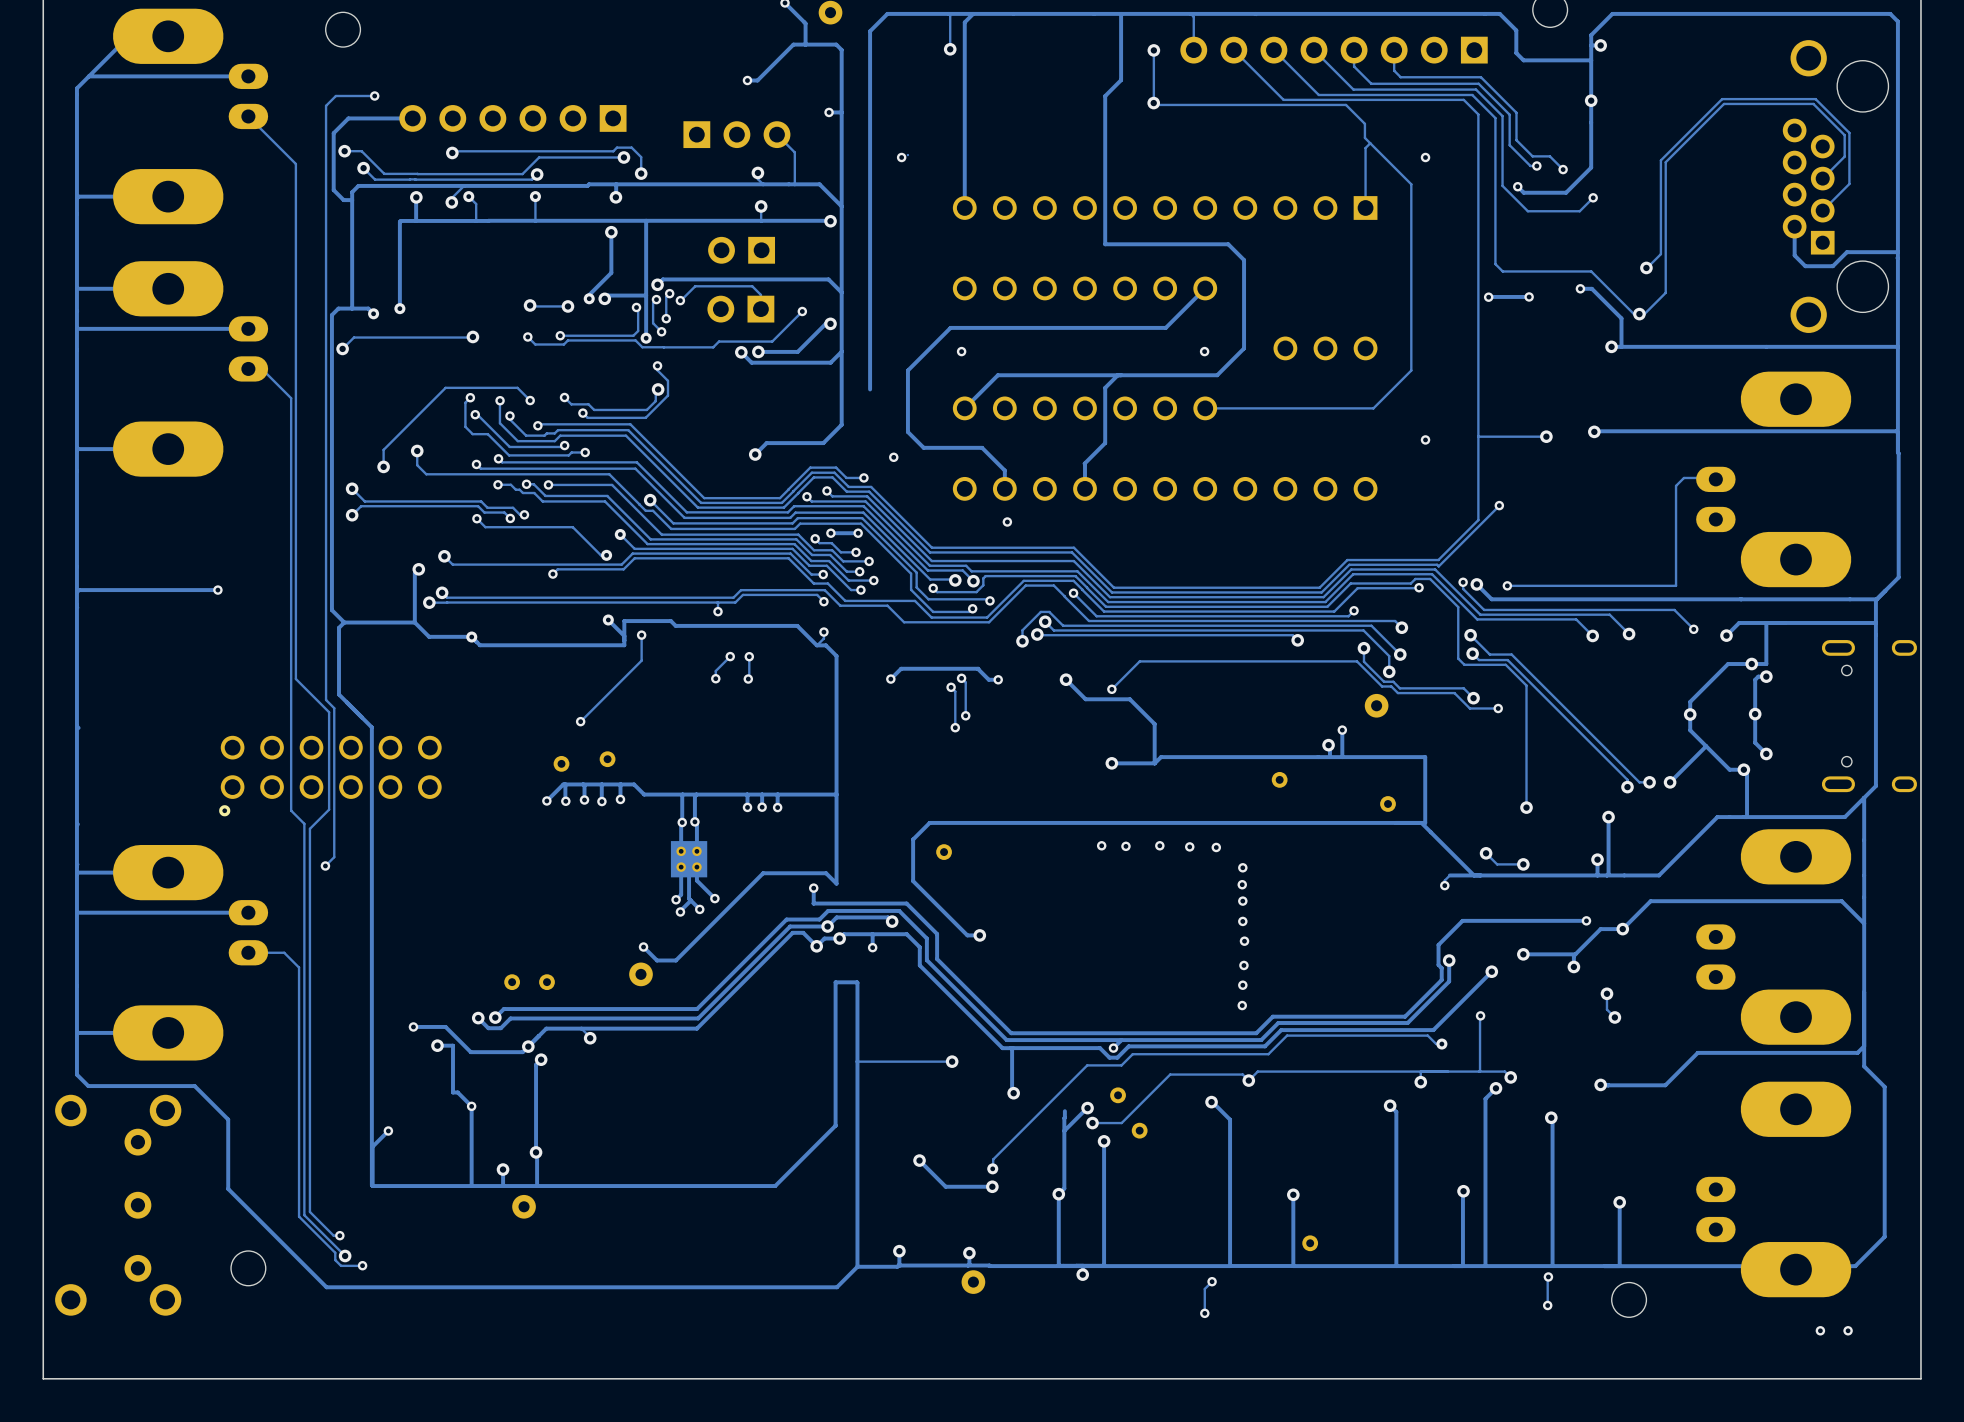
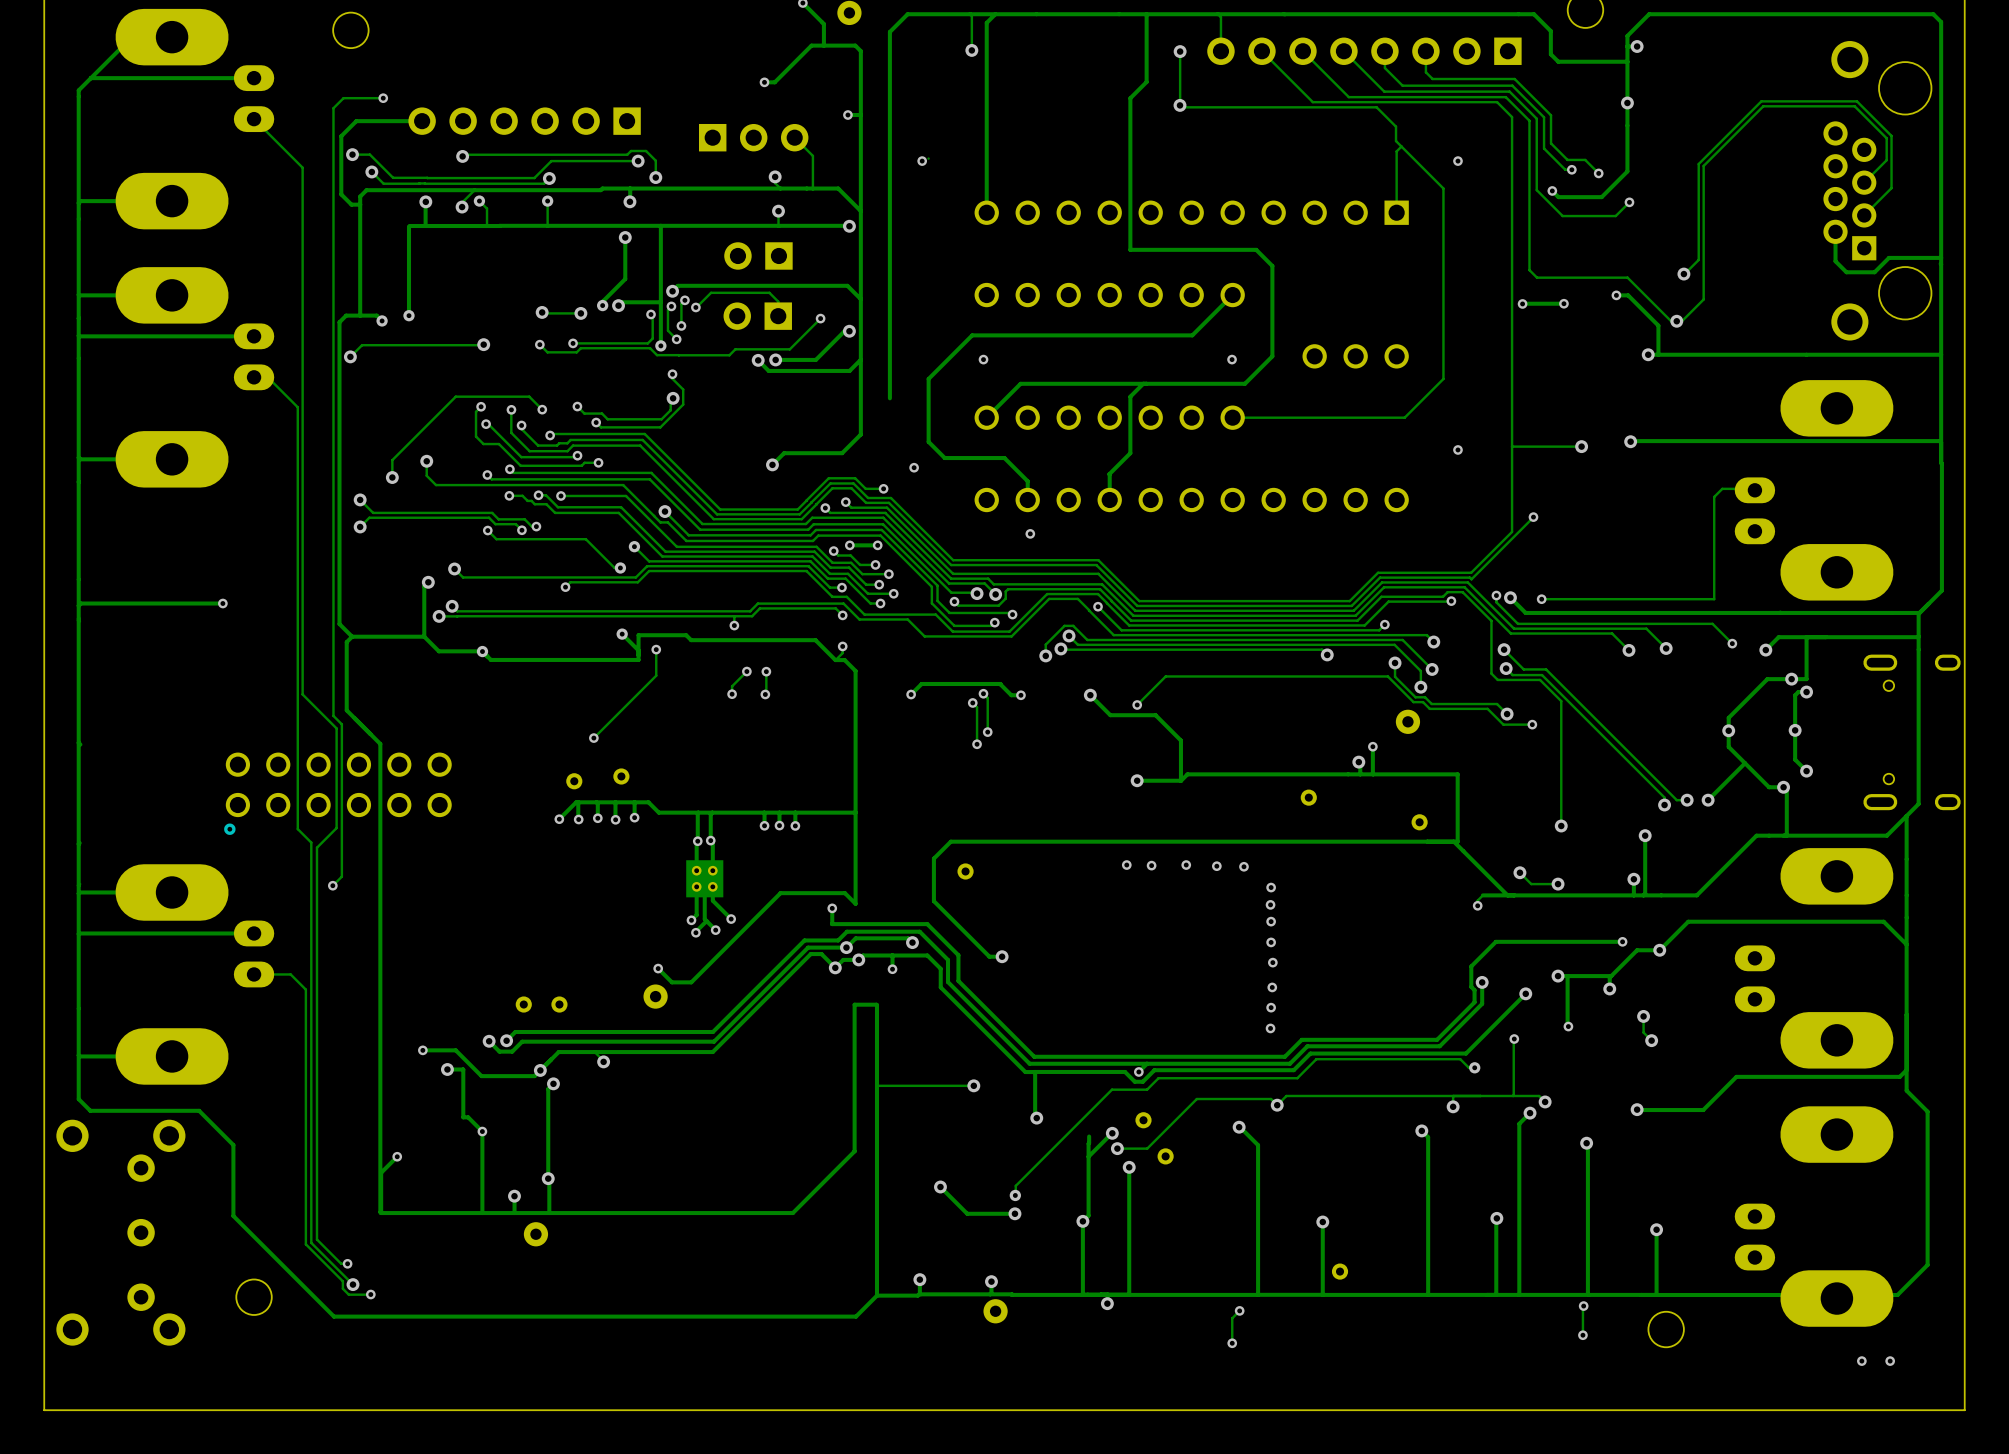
track: none -> (1567, 976) (1568, 1026)
via: none -> (1568, 1026)

